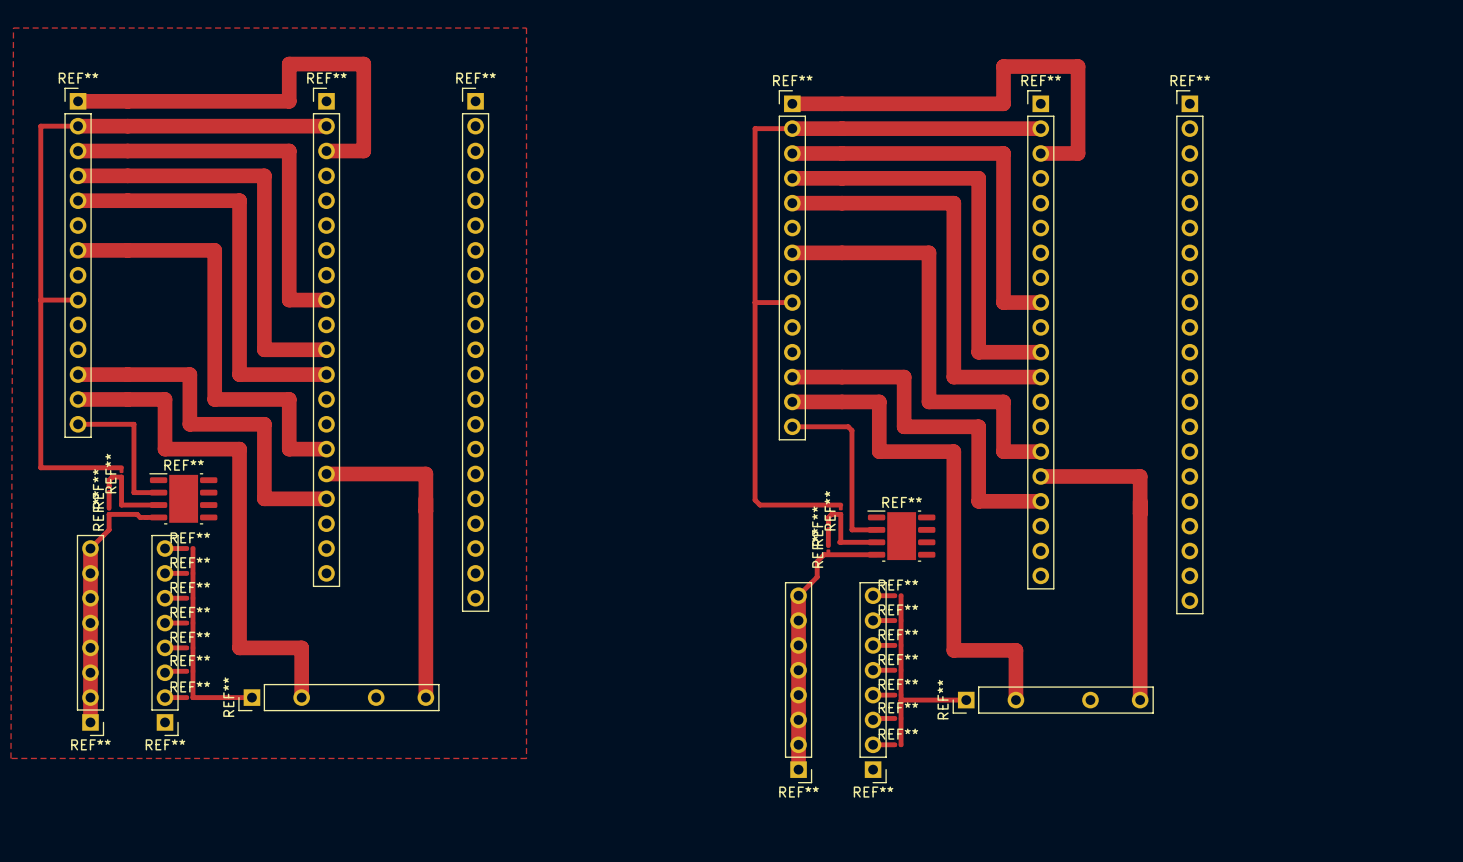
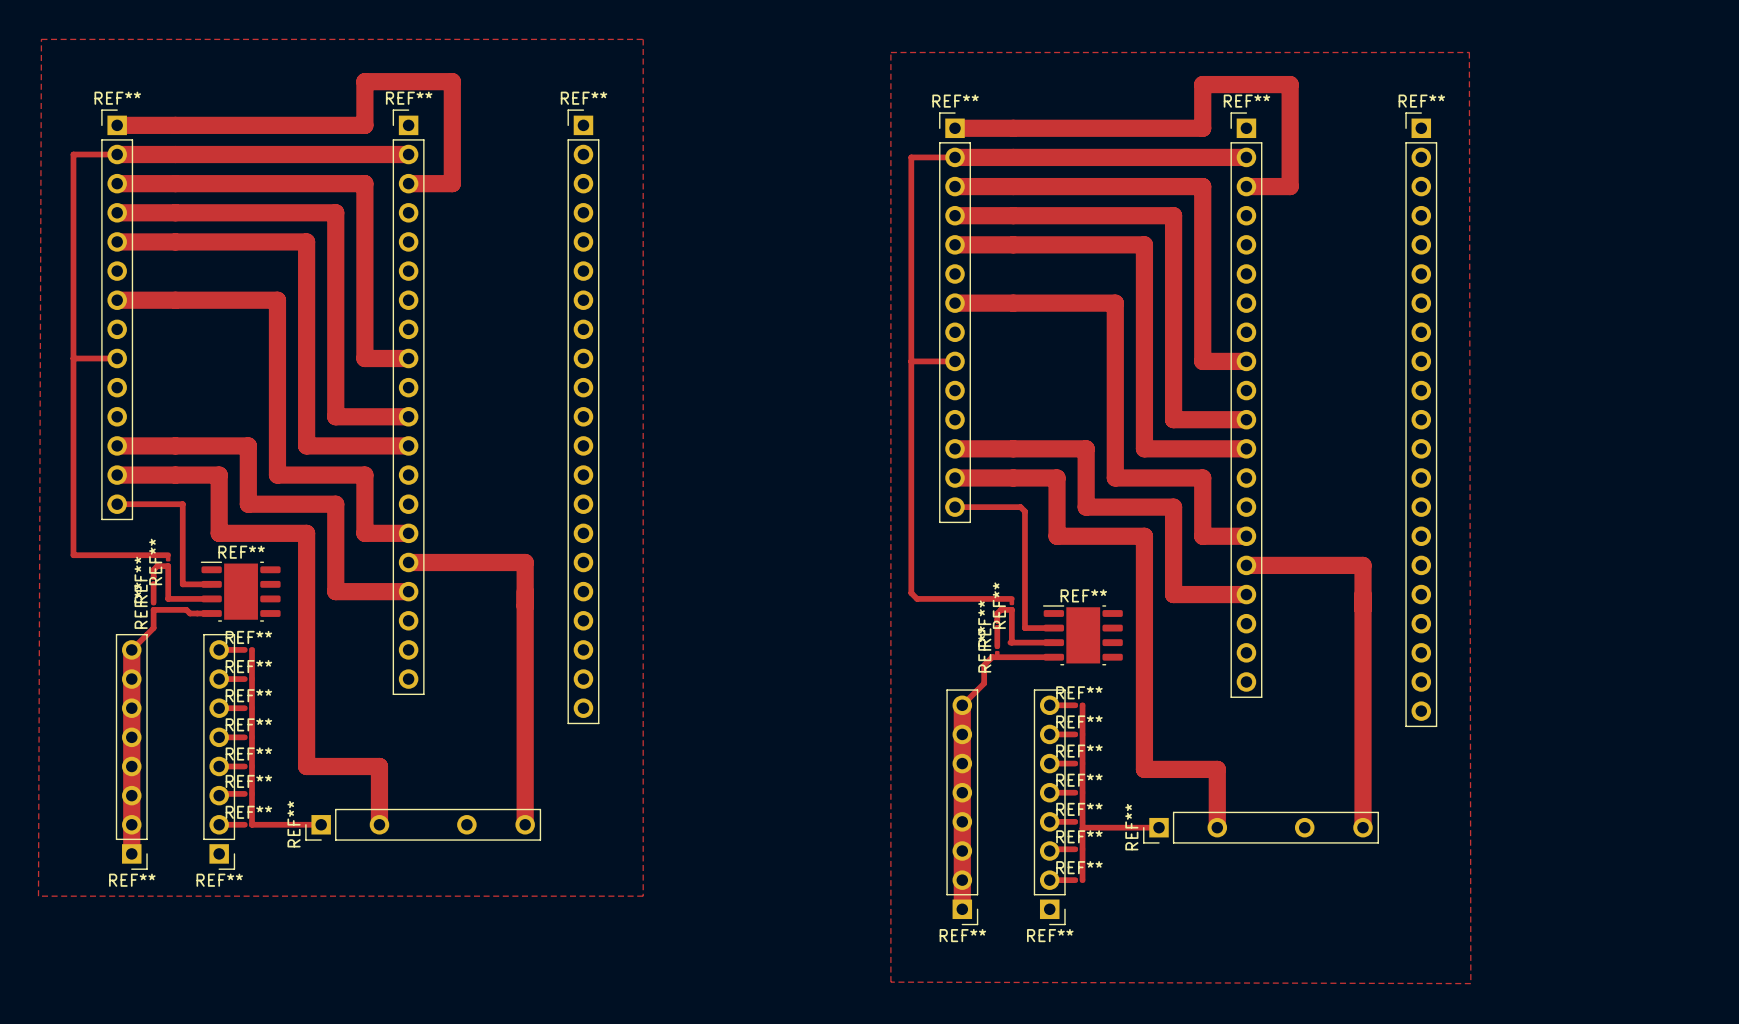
zone outline: none -> (890, 52) (890, 982) (1470, 983) (1469, 52) (890, 52)

